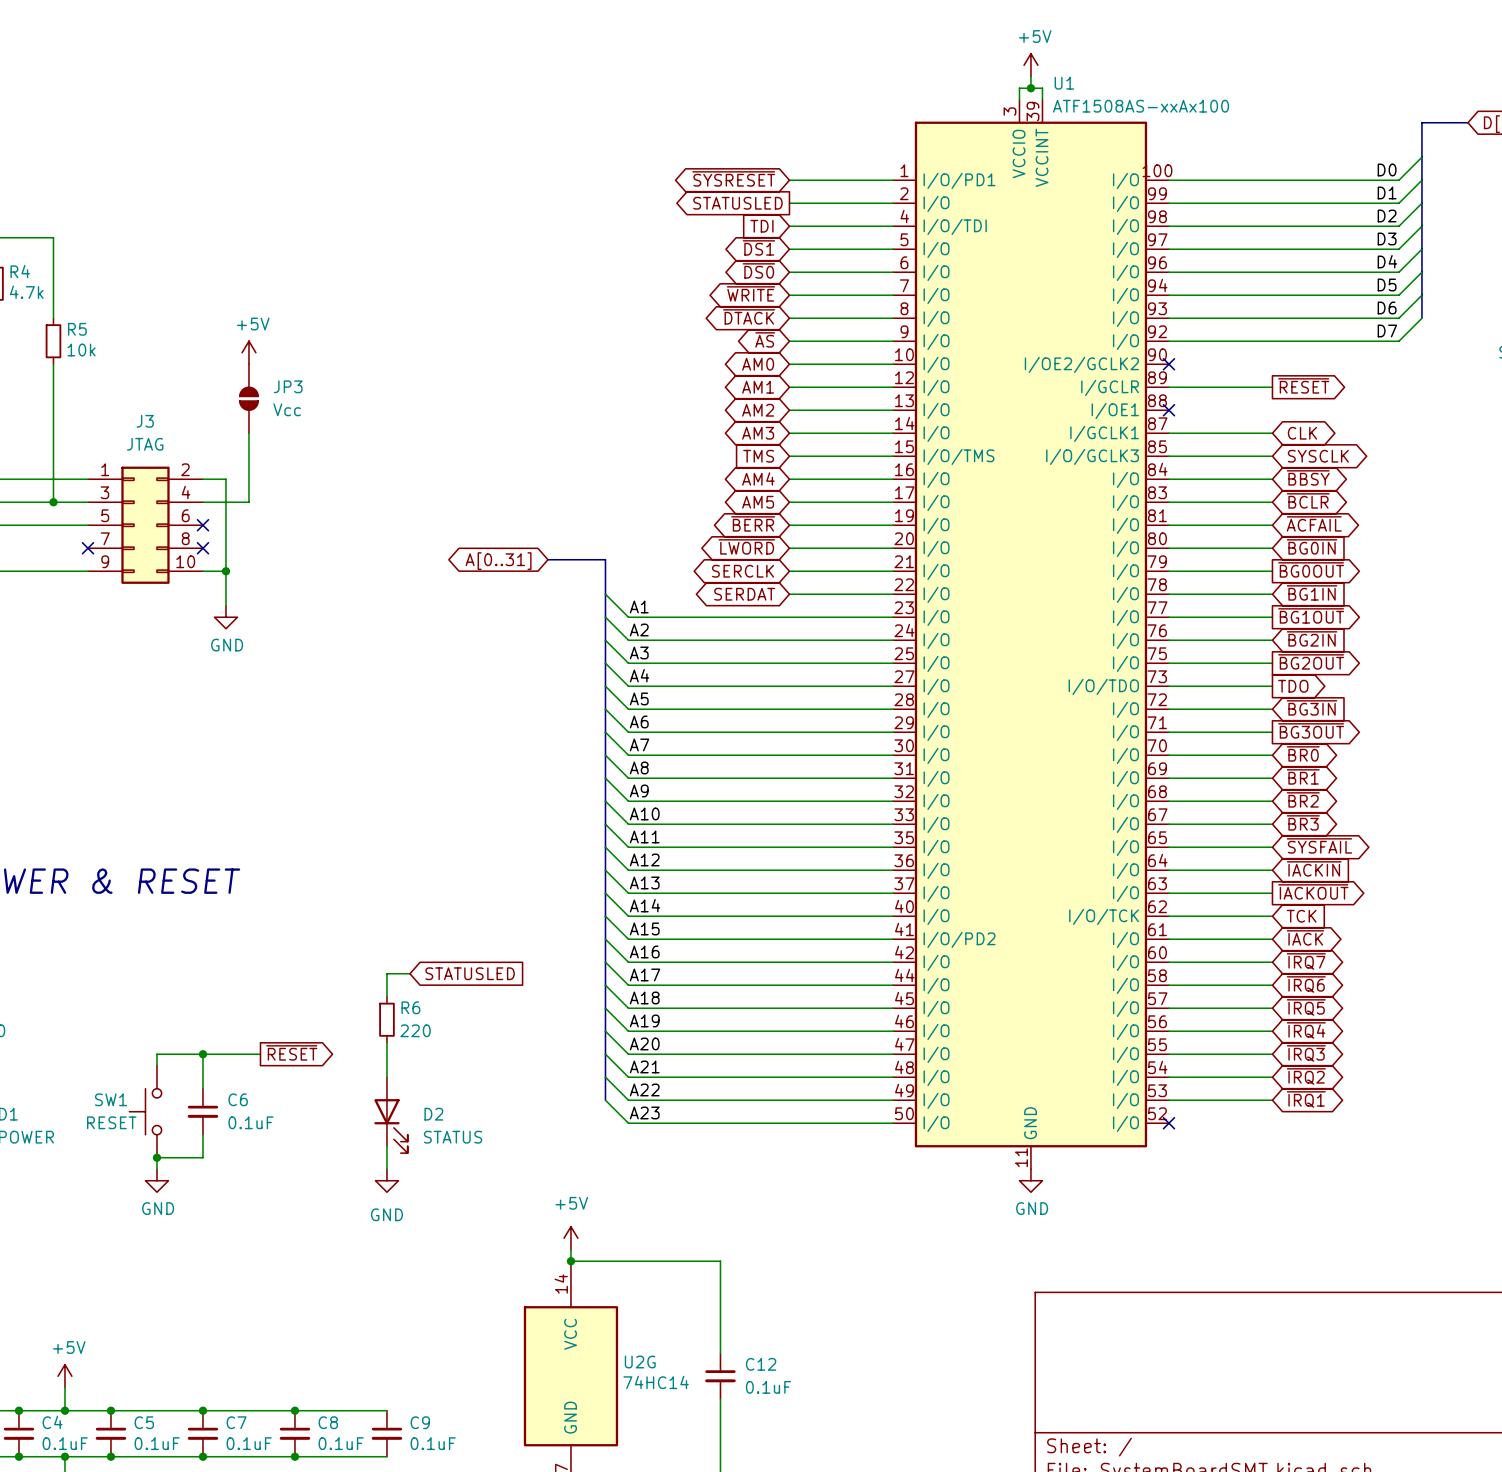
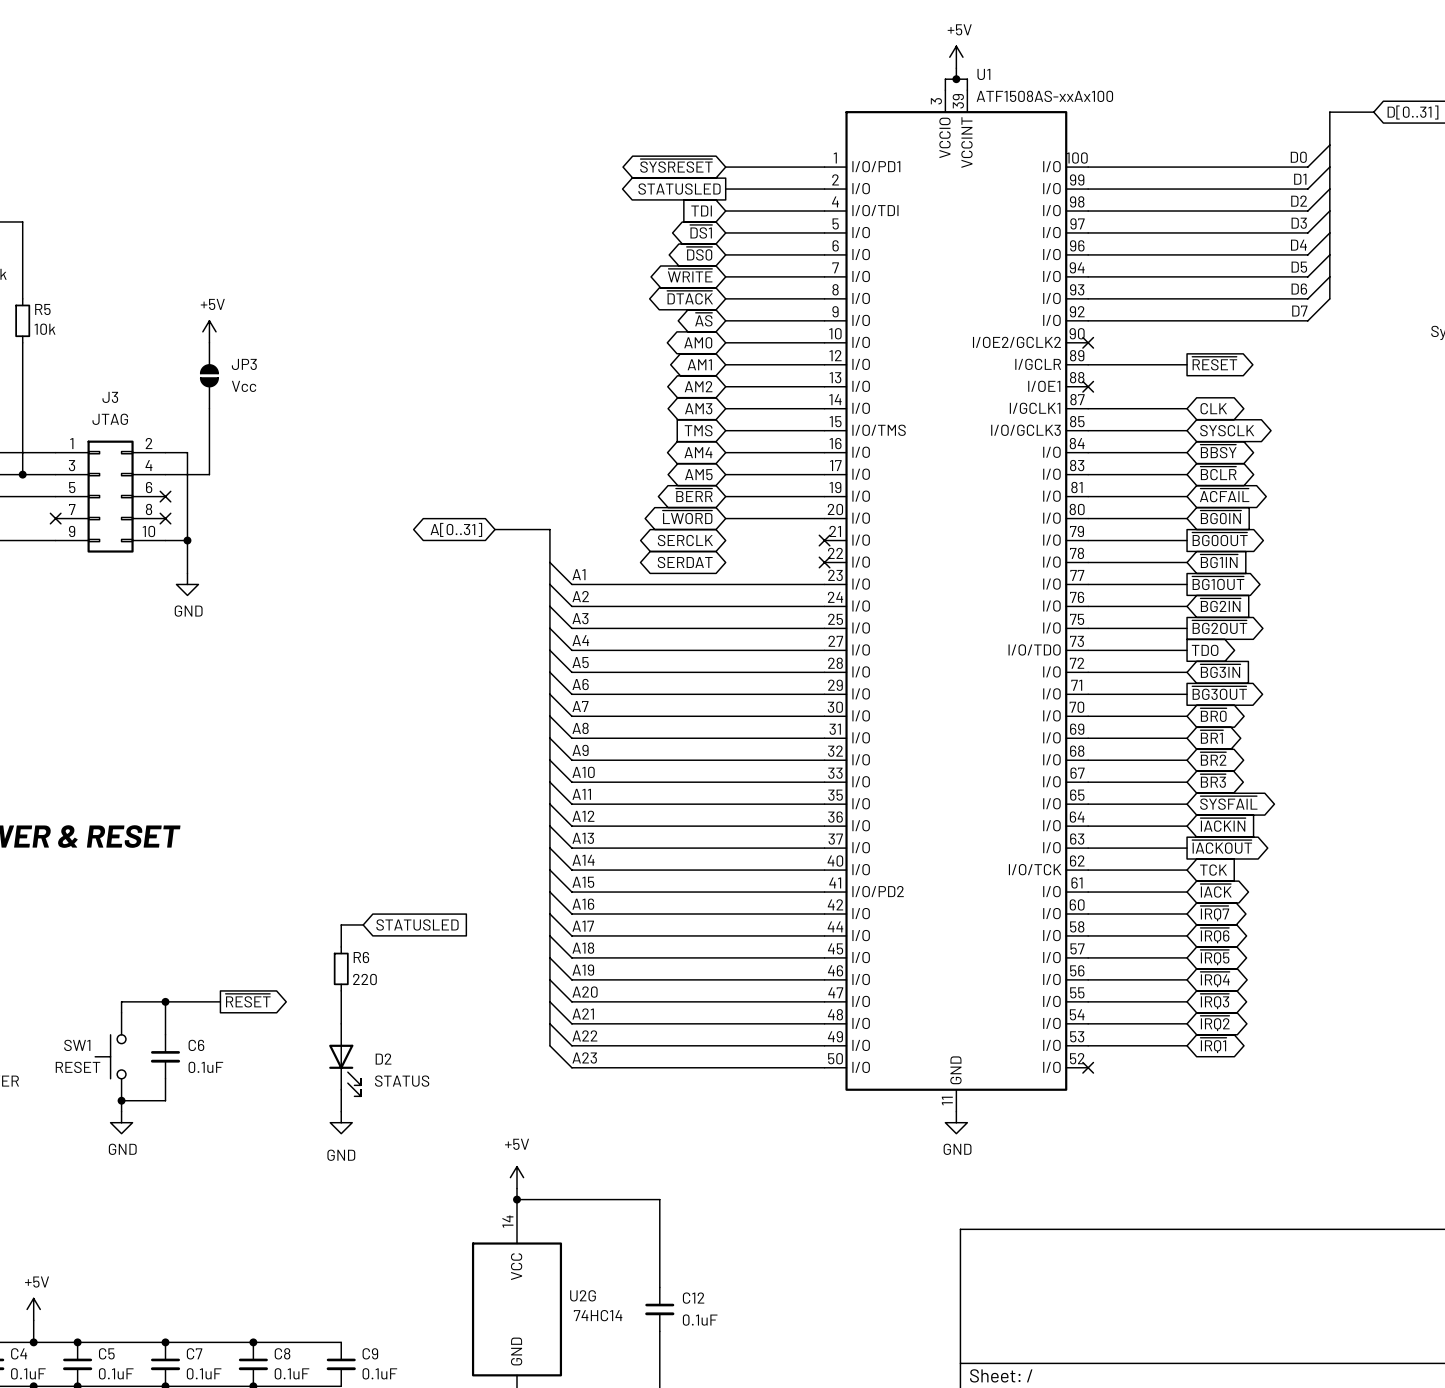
wire: (789, 571) (892, 571) -> none
no-connect mark: none -> (824, 540)
wire: (789, 594) (892, 594) -> none
no-connect mark: none -> (824, 562)

